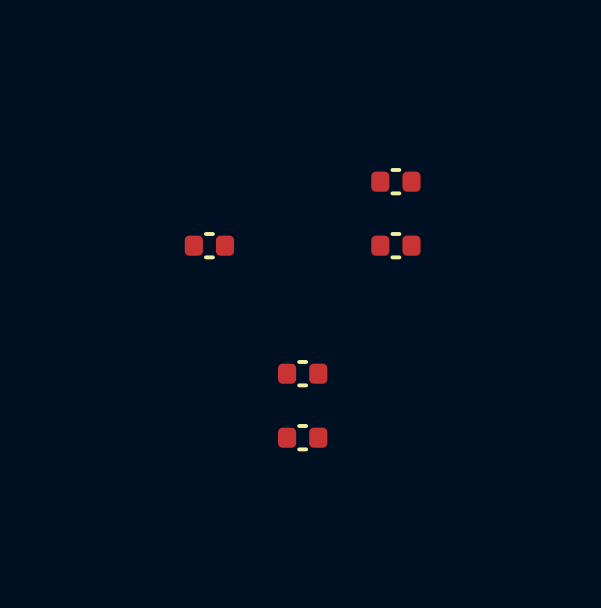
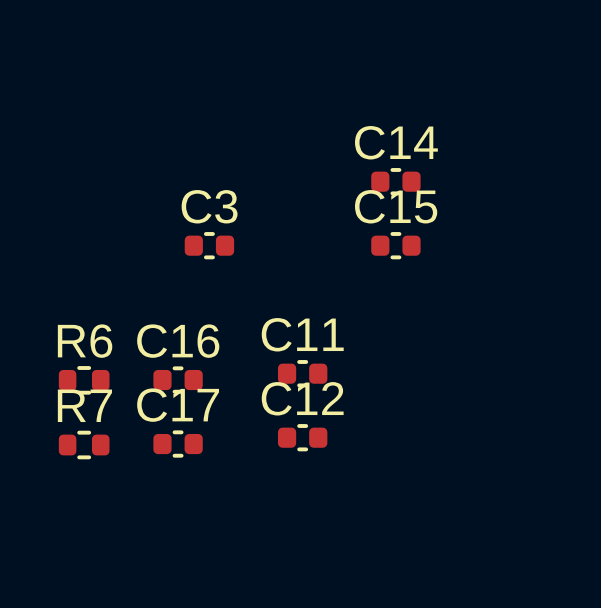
C14 name: none -> C14 (396, 142)
C3 name: none -> C3 (209, 206)
C15 name: none -> C15 (396, 206)
C11 name: none -> C11 (302, 334)
R6: none -> (84, 380)
C16: none -> (178, 380)
C12 name: none -> C12 (302, 398)
C17: none -> (178, 444)
R7: none -> (84, 445)

